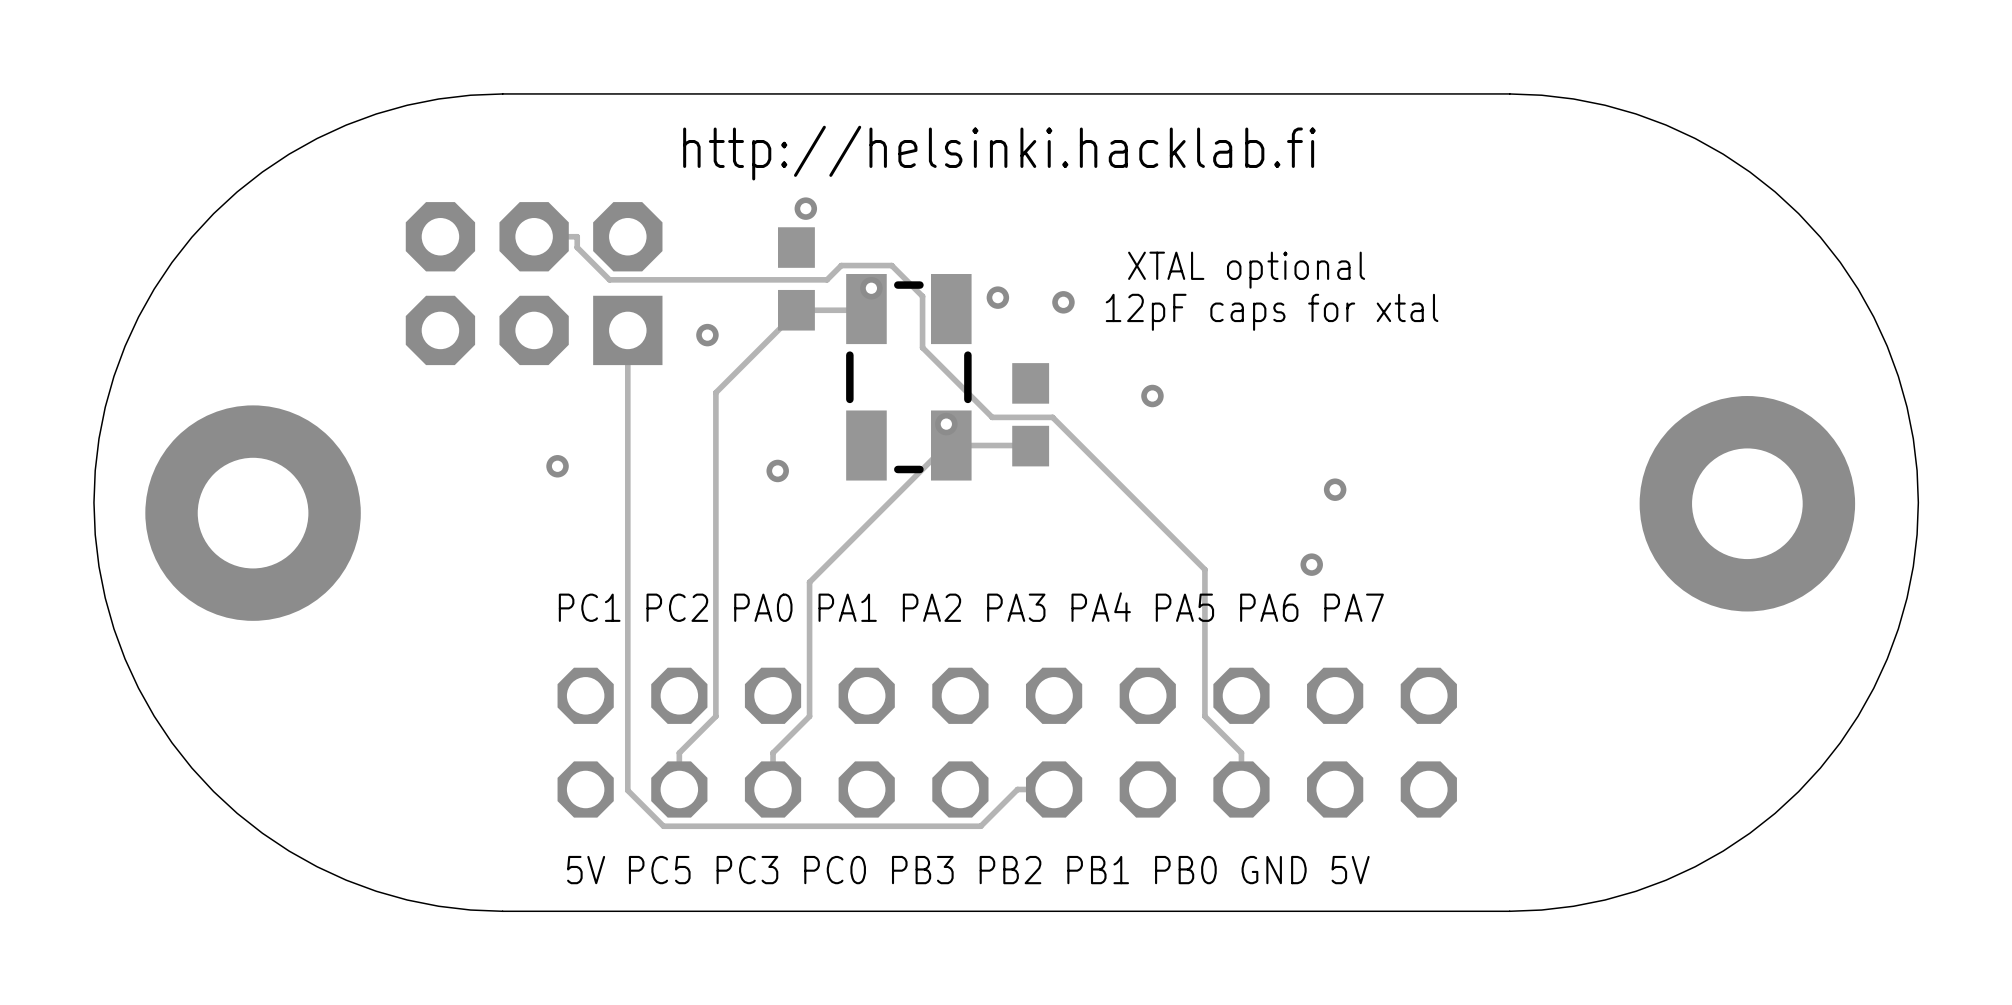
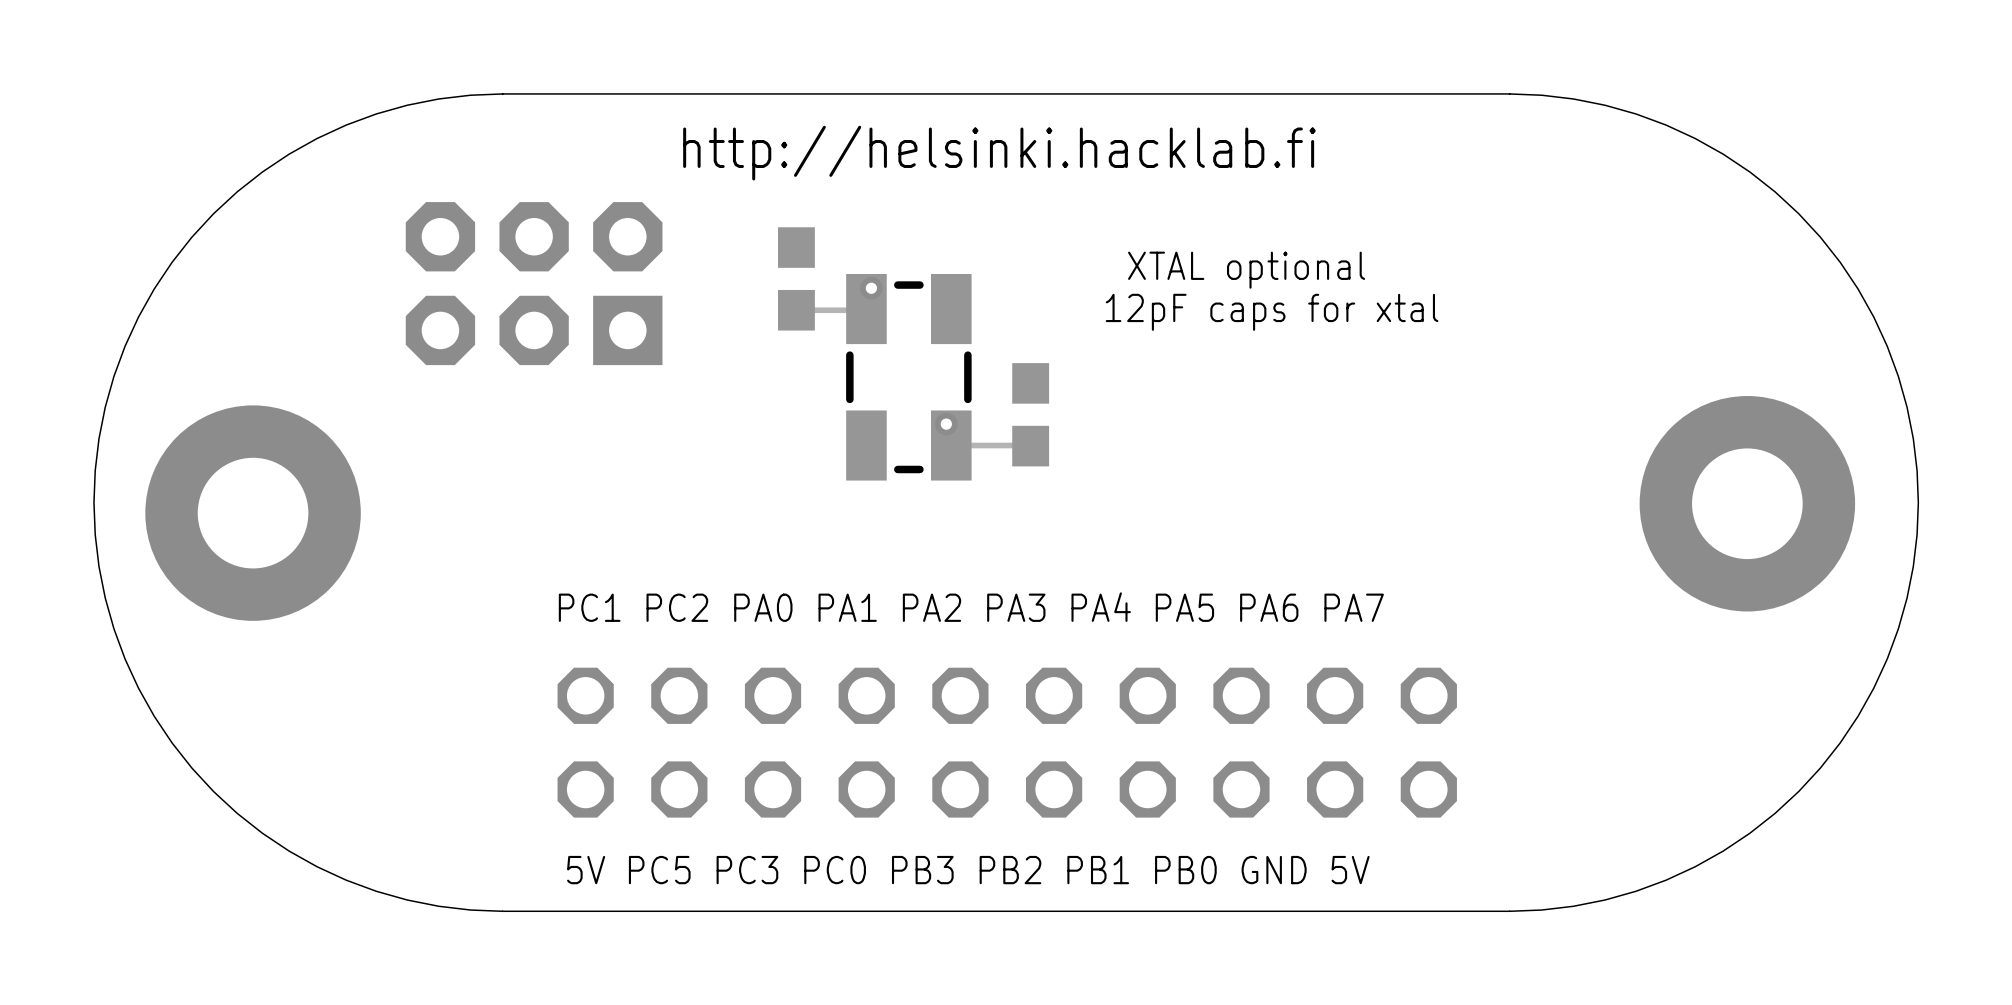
via: (805, 208) -> none
track: (534, 236) (577, 236) (577, 247) (609, 279) (827, 279) (841, 265) (891, 265) (922, 296) (922, 347) (992, 417) (1052, 417) (1204, 569) (1204, 716) (1241, 752) (1241, 789) -> none
via: (997, 297) -> none
via: (1063, 302) -> none
track: (798, 310) (715, 392) (715, 716) (679, 752) (679, 789) -> none
track: (627, 330) (627, 790) (663, 826) (980, 826) (1017, 789) (1054, 789) -> none
via: (707, 335) -> none
via: (1152, 396) -> none
track: (948, 443) (809, 582) (809, 716) (773, 752) (773, 789) -> none
via: (557, 466) -> none
via: (777, 470) -> none
via: (1335, 489) -> none
via: (1311, 564) -> none

